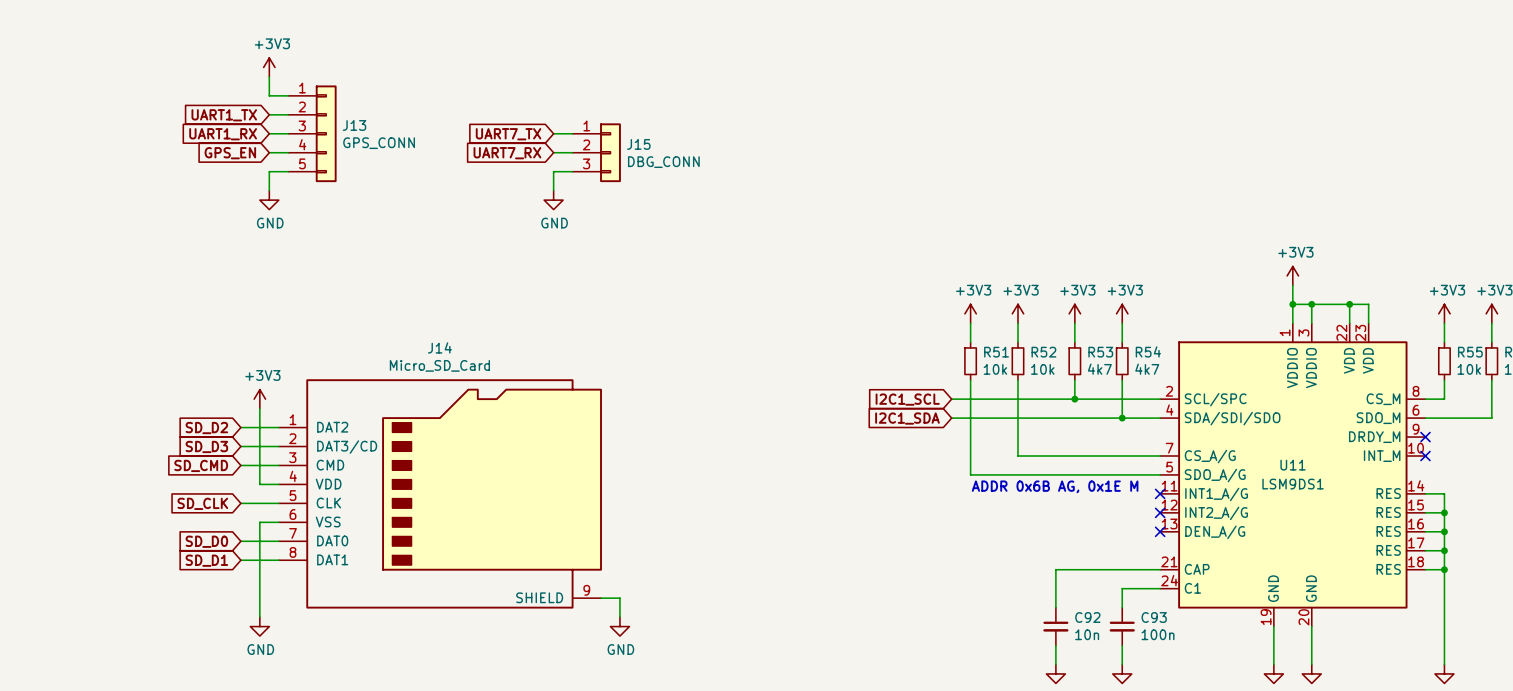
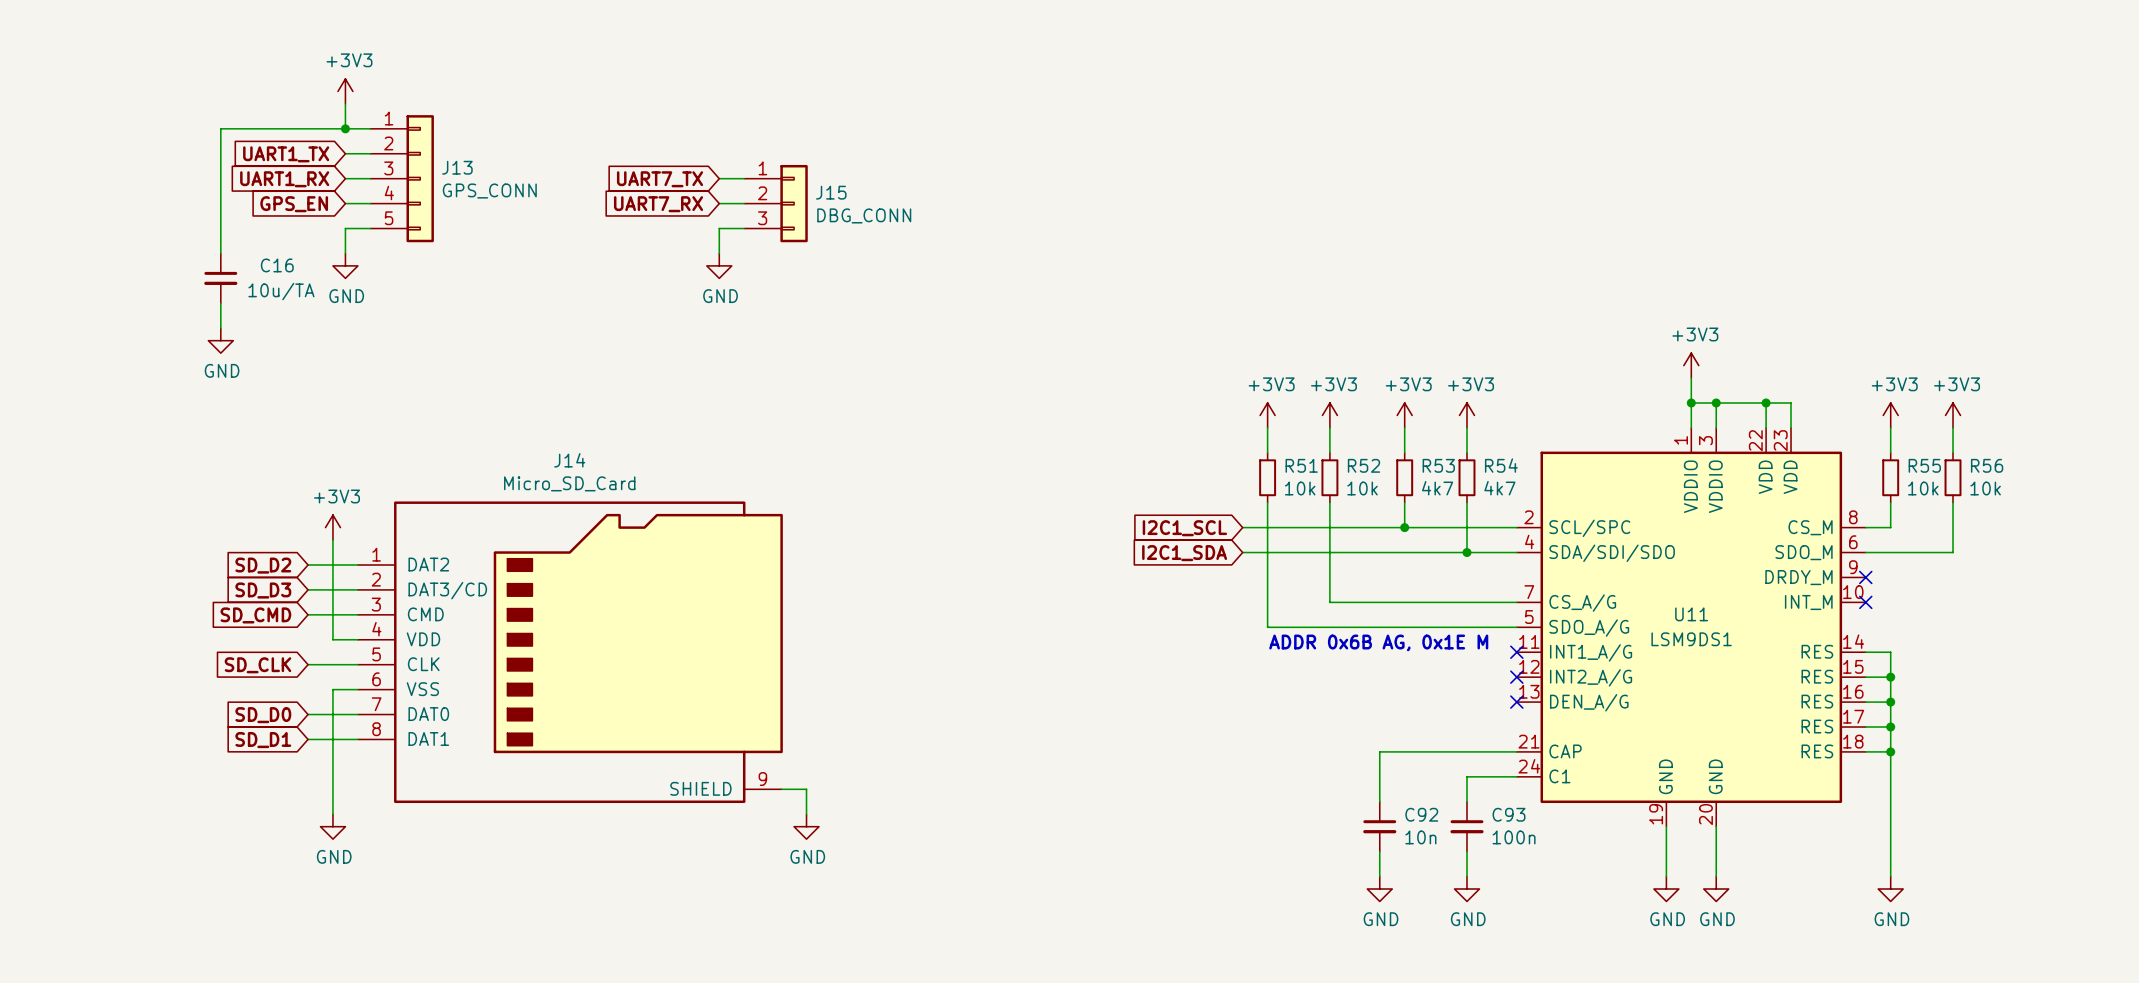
wire: none -> (345, 128) (220, 128) (220, 253)
junction: none -> (345, 128)
C16: none -> 10u/TA (220, 278)
wire: none -> (220, 303) (220, 328)
power symbol: none -> GND (220, 340)

